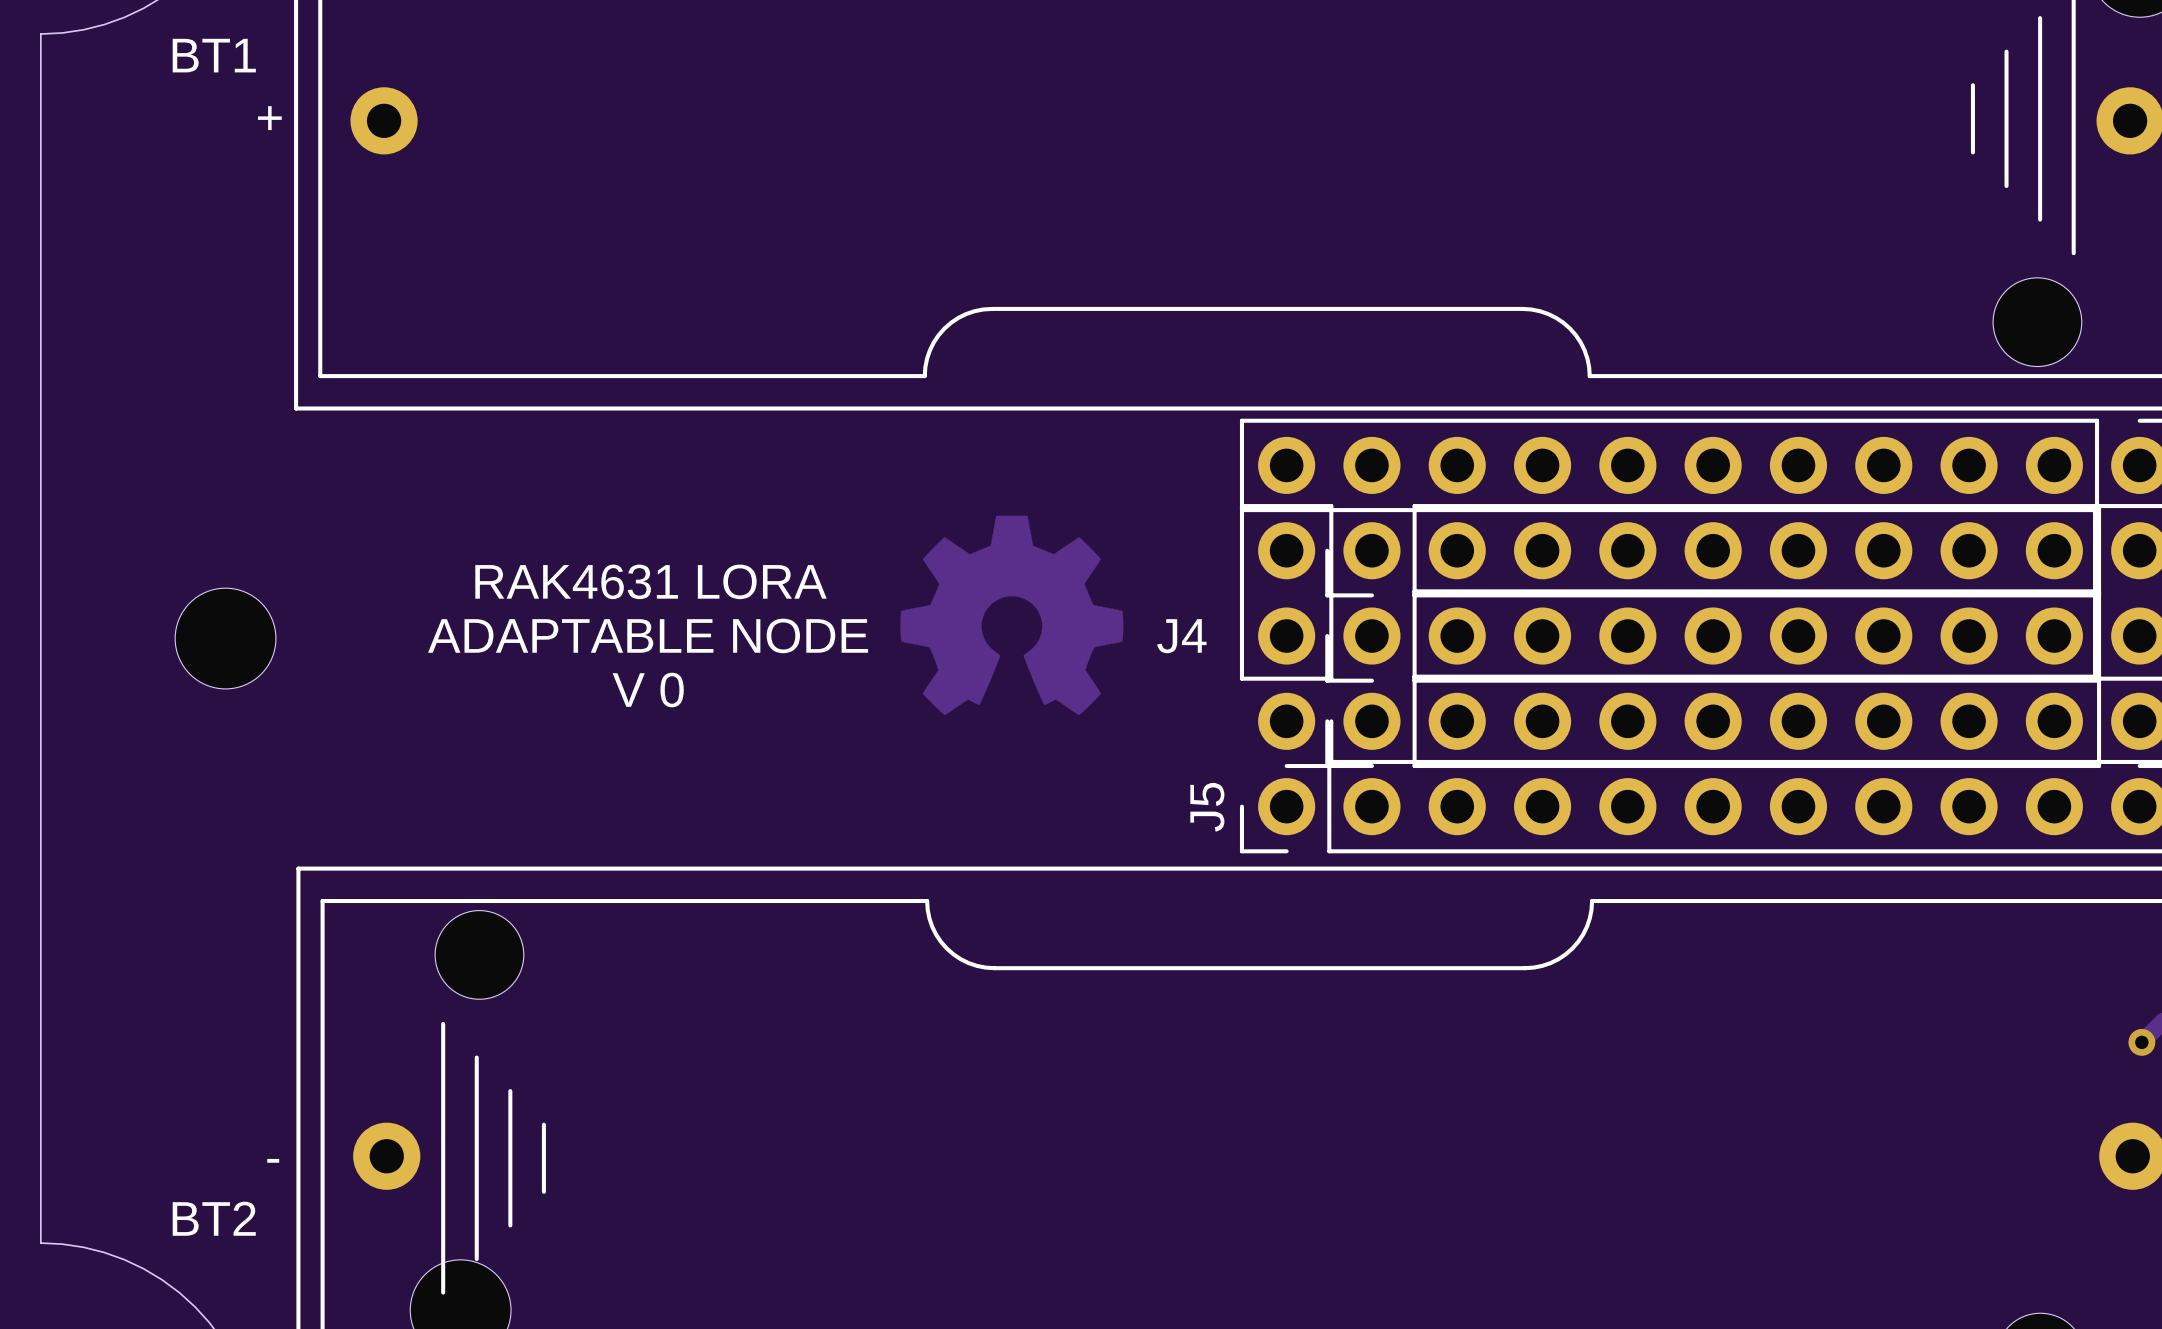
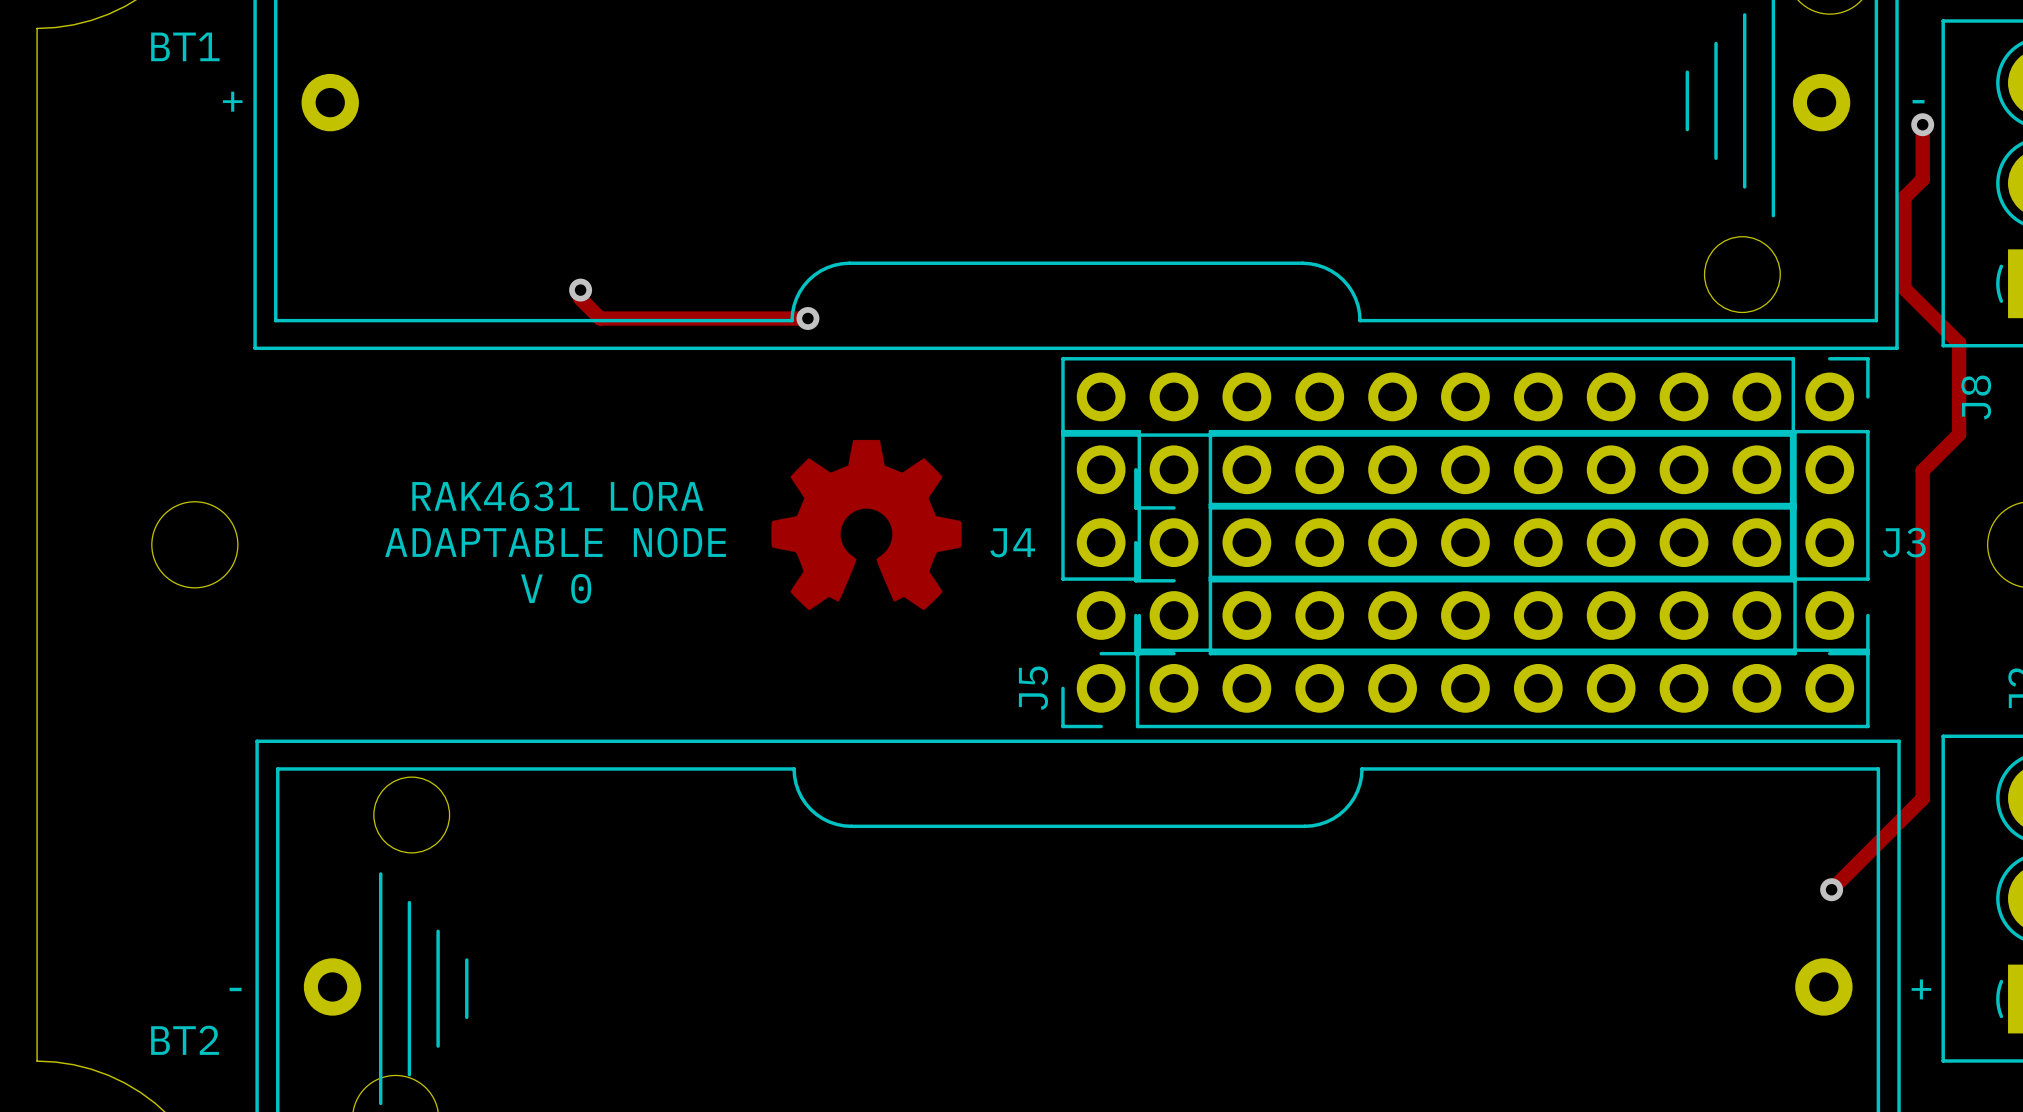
track: none -> (580, 290) (579, 298) (600, 318) (807, 318)
via: none -> (580, 290)
via: none -> (807, 318)

